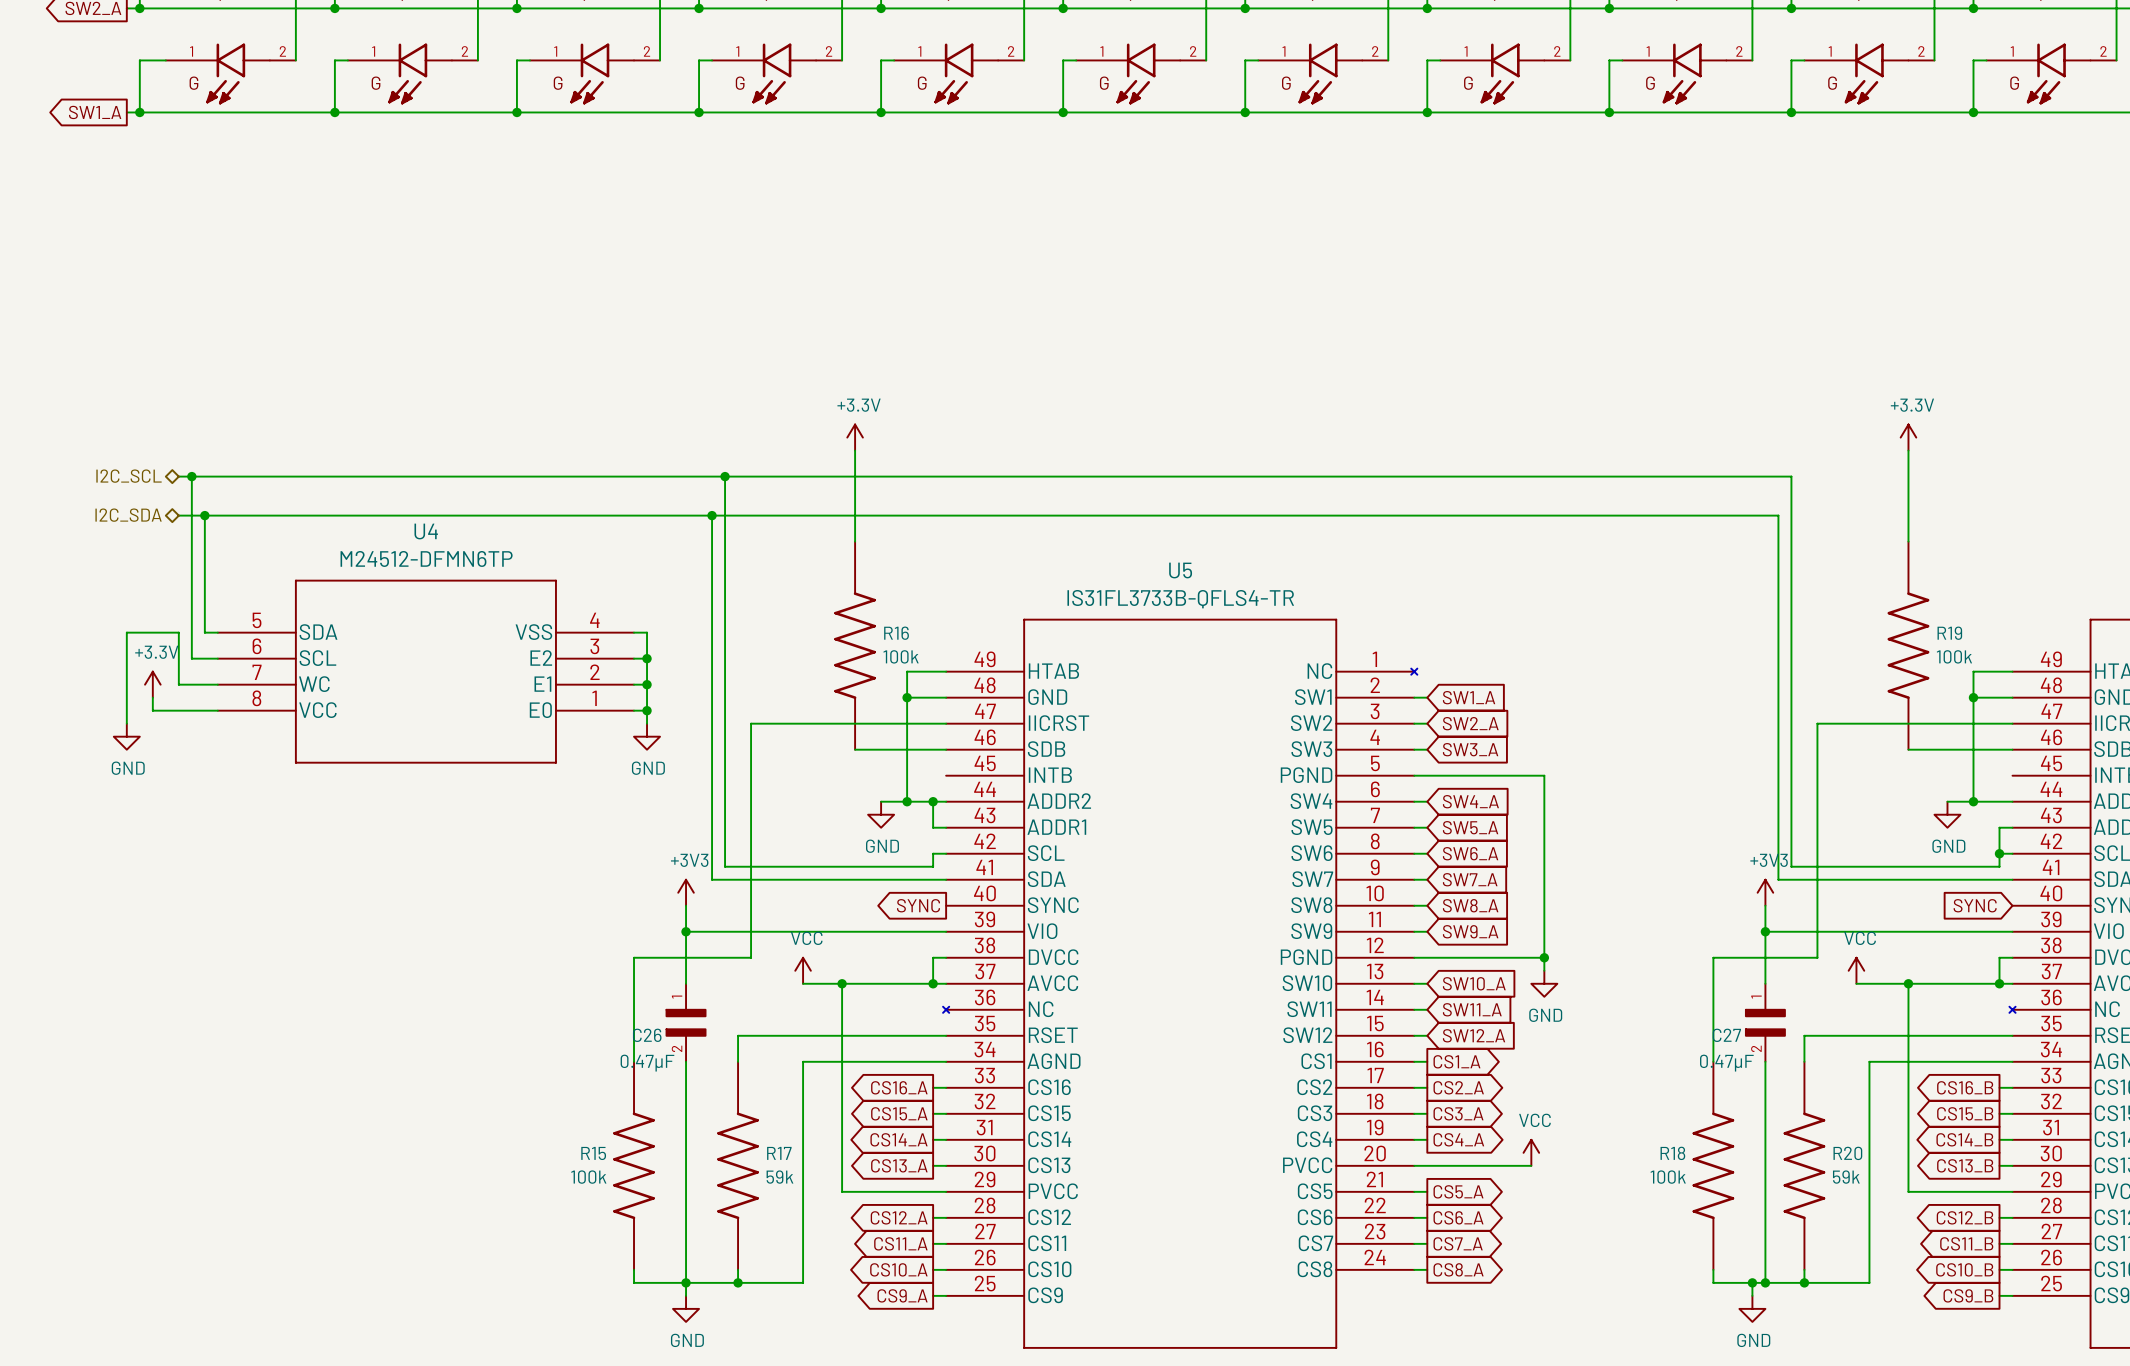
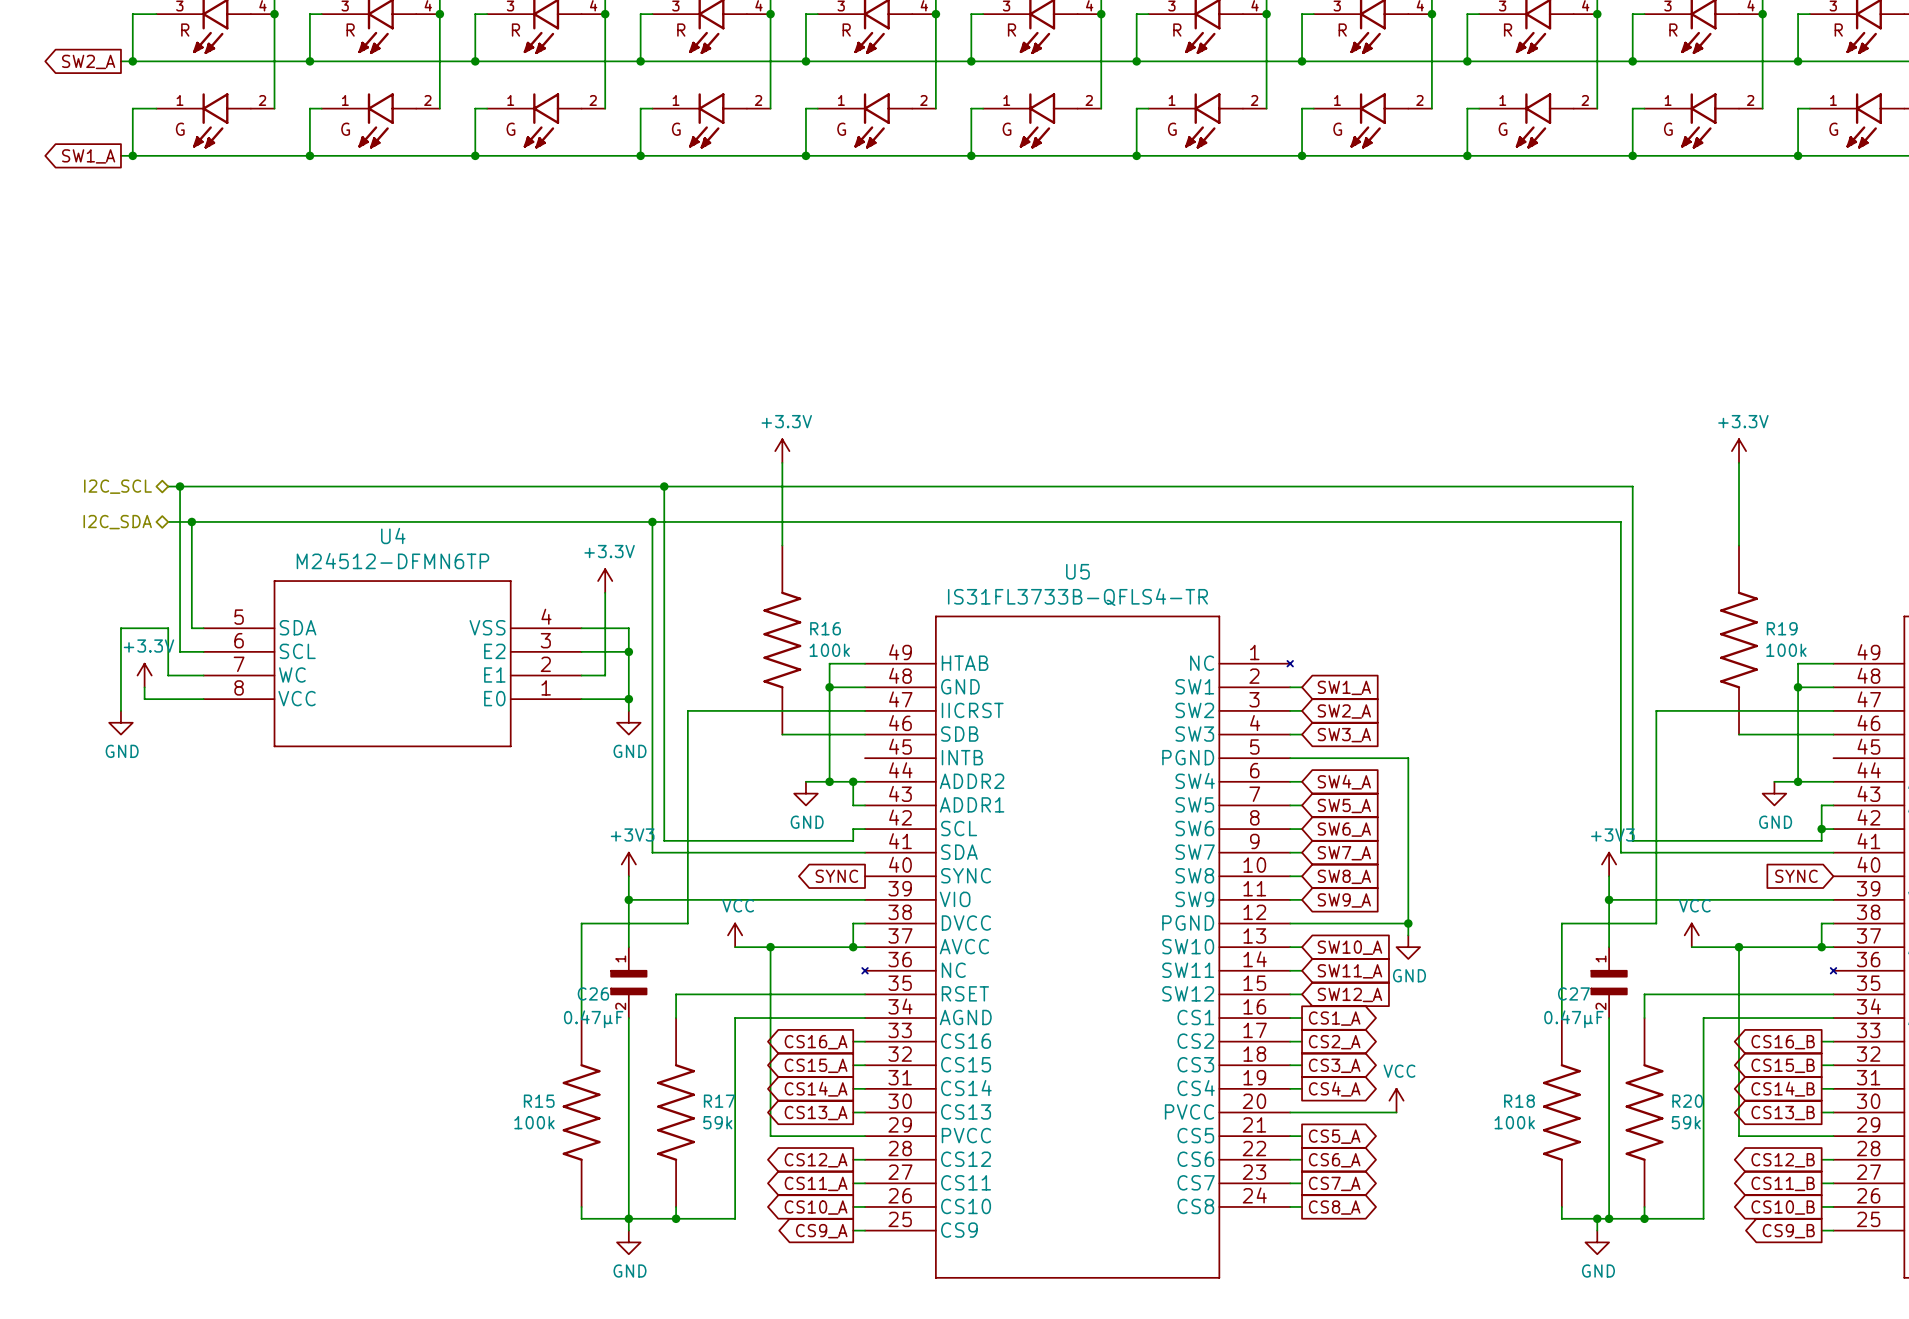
power symbol: none -> +3.3V (605, 581)
wire: none -> (605, 592) (605, 675) (593, 675)
wire: (647, 632) (647, 723) -> (593, 628) (628, 628) (628, 710)
wire: none -> (593, 651) (628, 651)
junction: (647, 658) -> none
junction: none -> (628, 651)
junction: (647, 684) -> none
wire: none -> (593, 699) (628, 699)
junction: (647, 710) -> none
junction: none -> (628, 699)
power symbol position: GND (647, 736) -> GND (628, 722)

